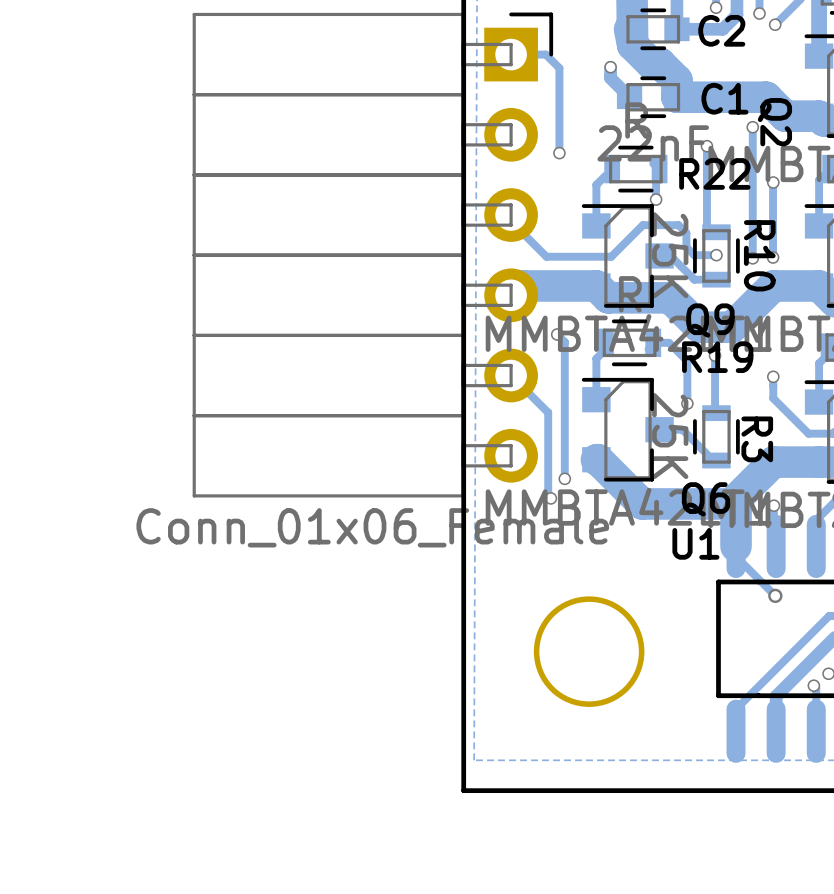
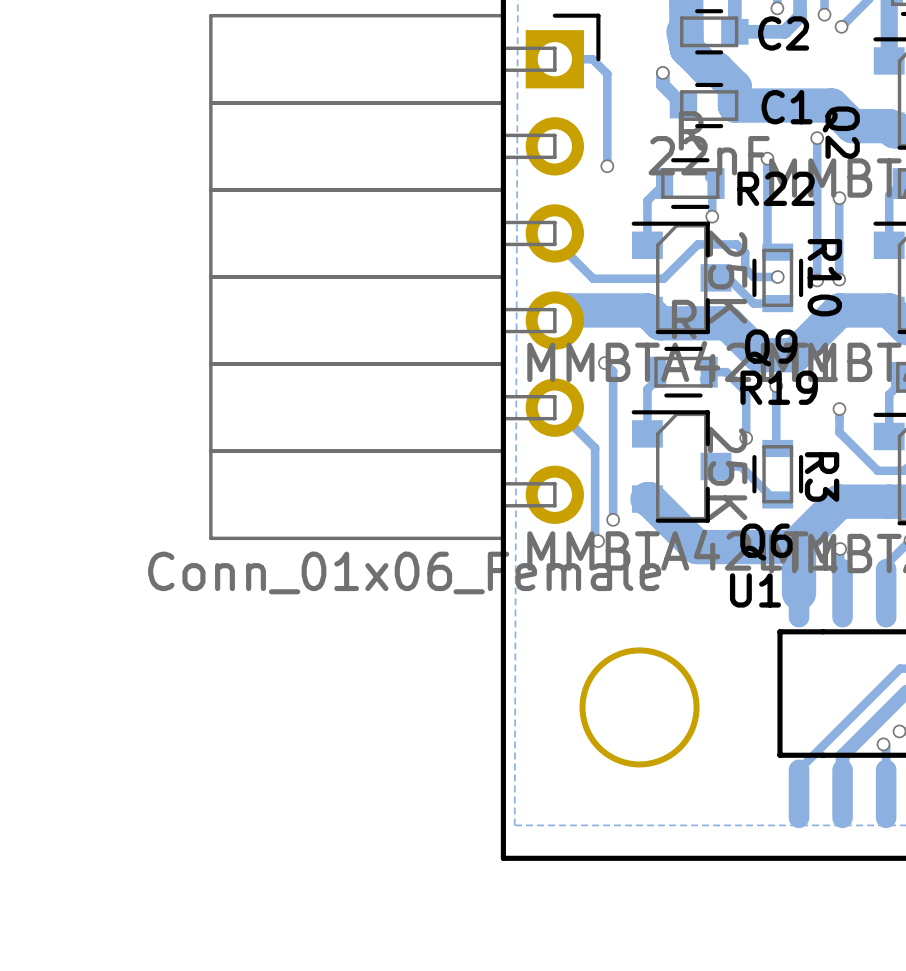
track: (736, 556) (775, 595) -> none
via: (775, 595) -> none

